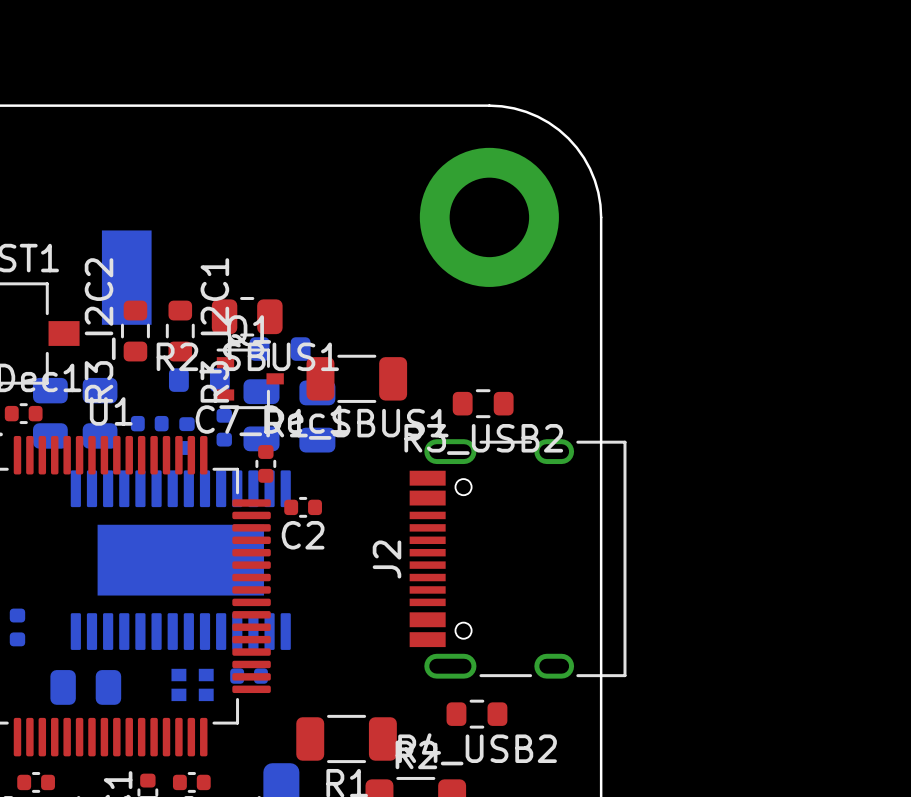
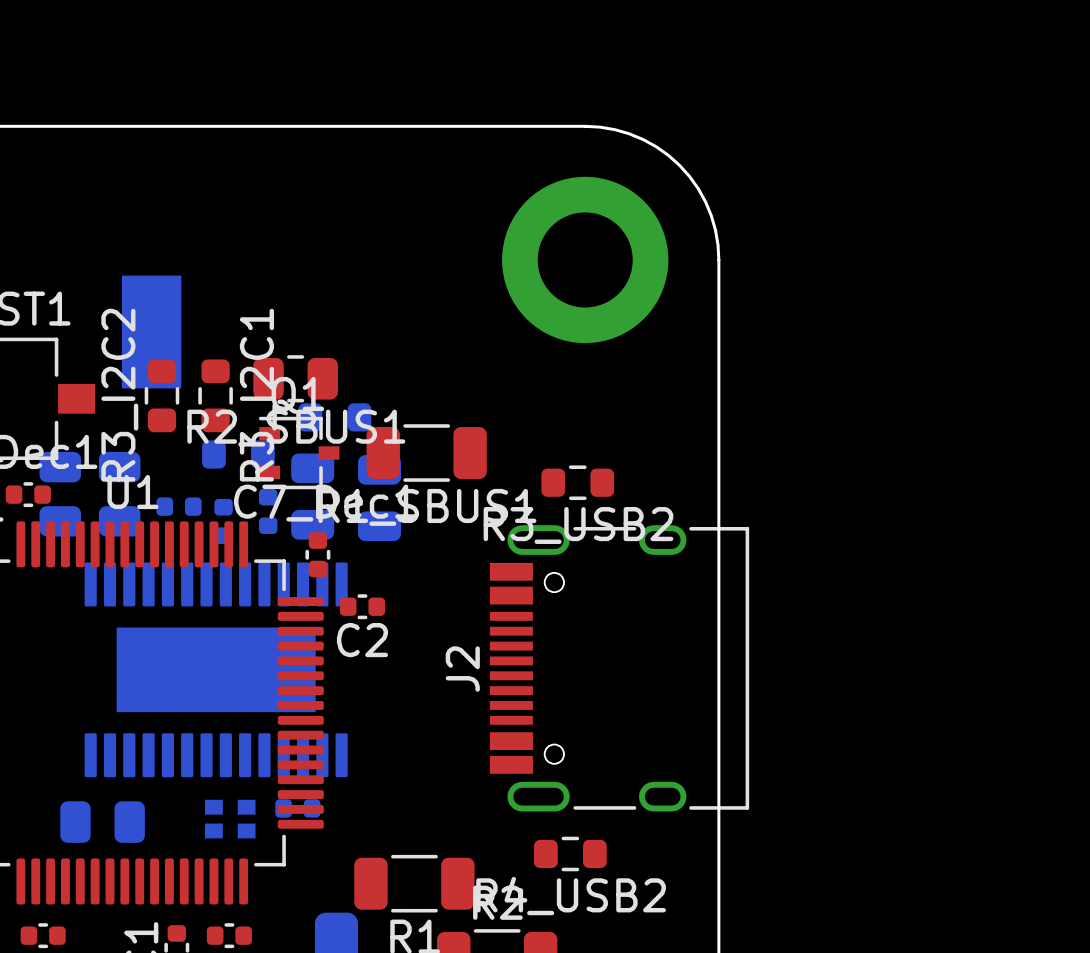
part: (17, 627) -> none

